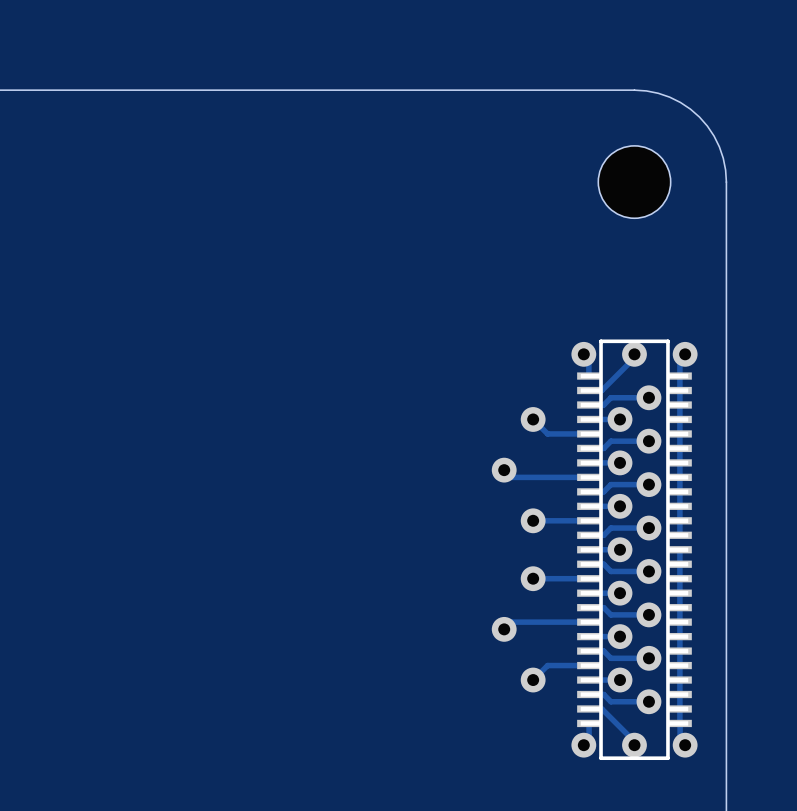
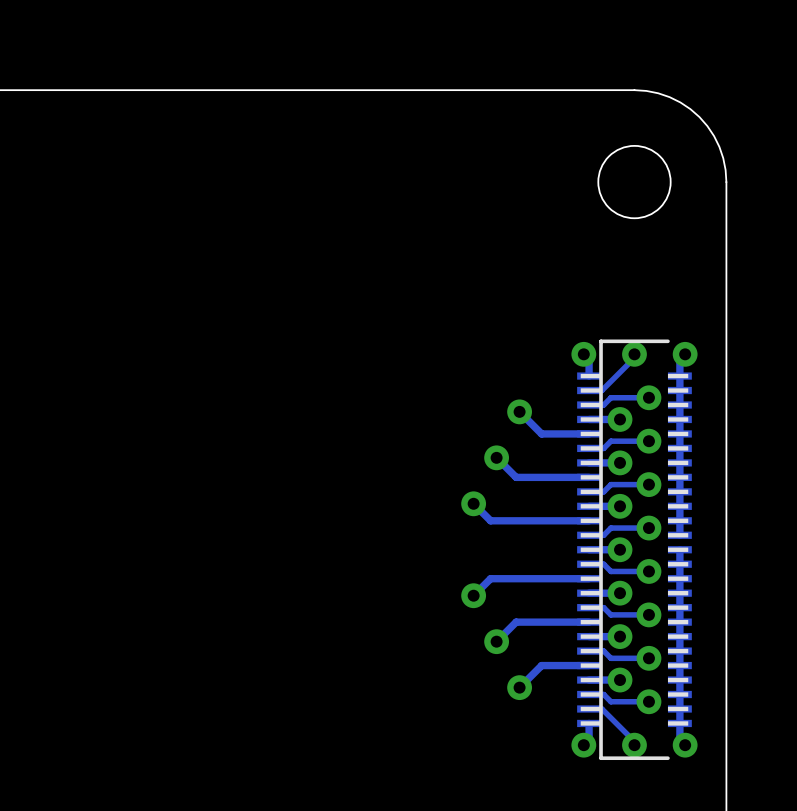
part footprint: [491, 339, 698, 761] -> [461, 339, 698, 761]

